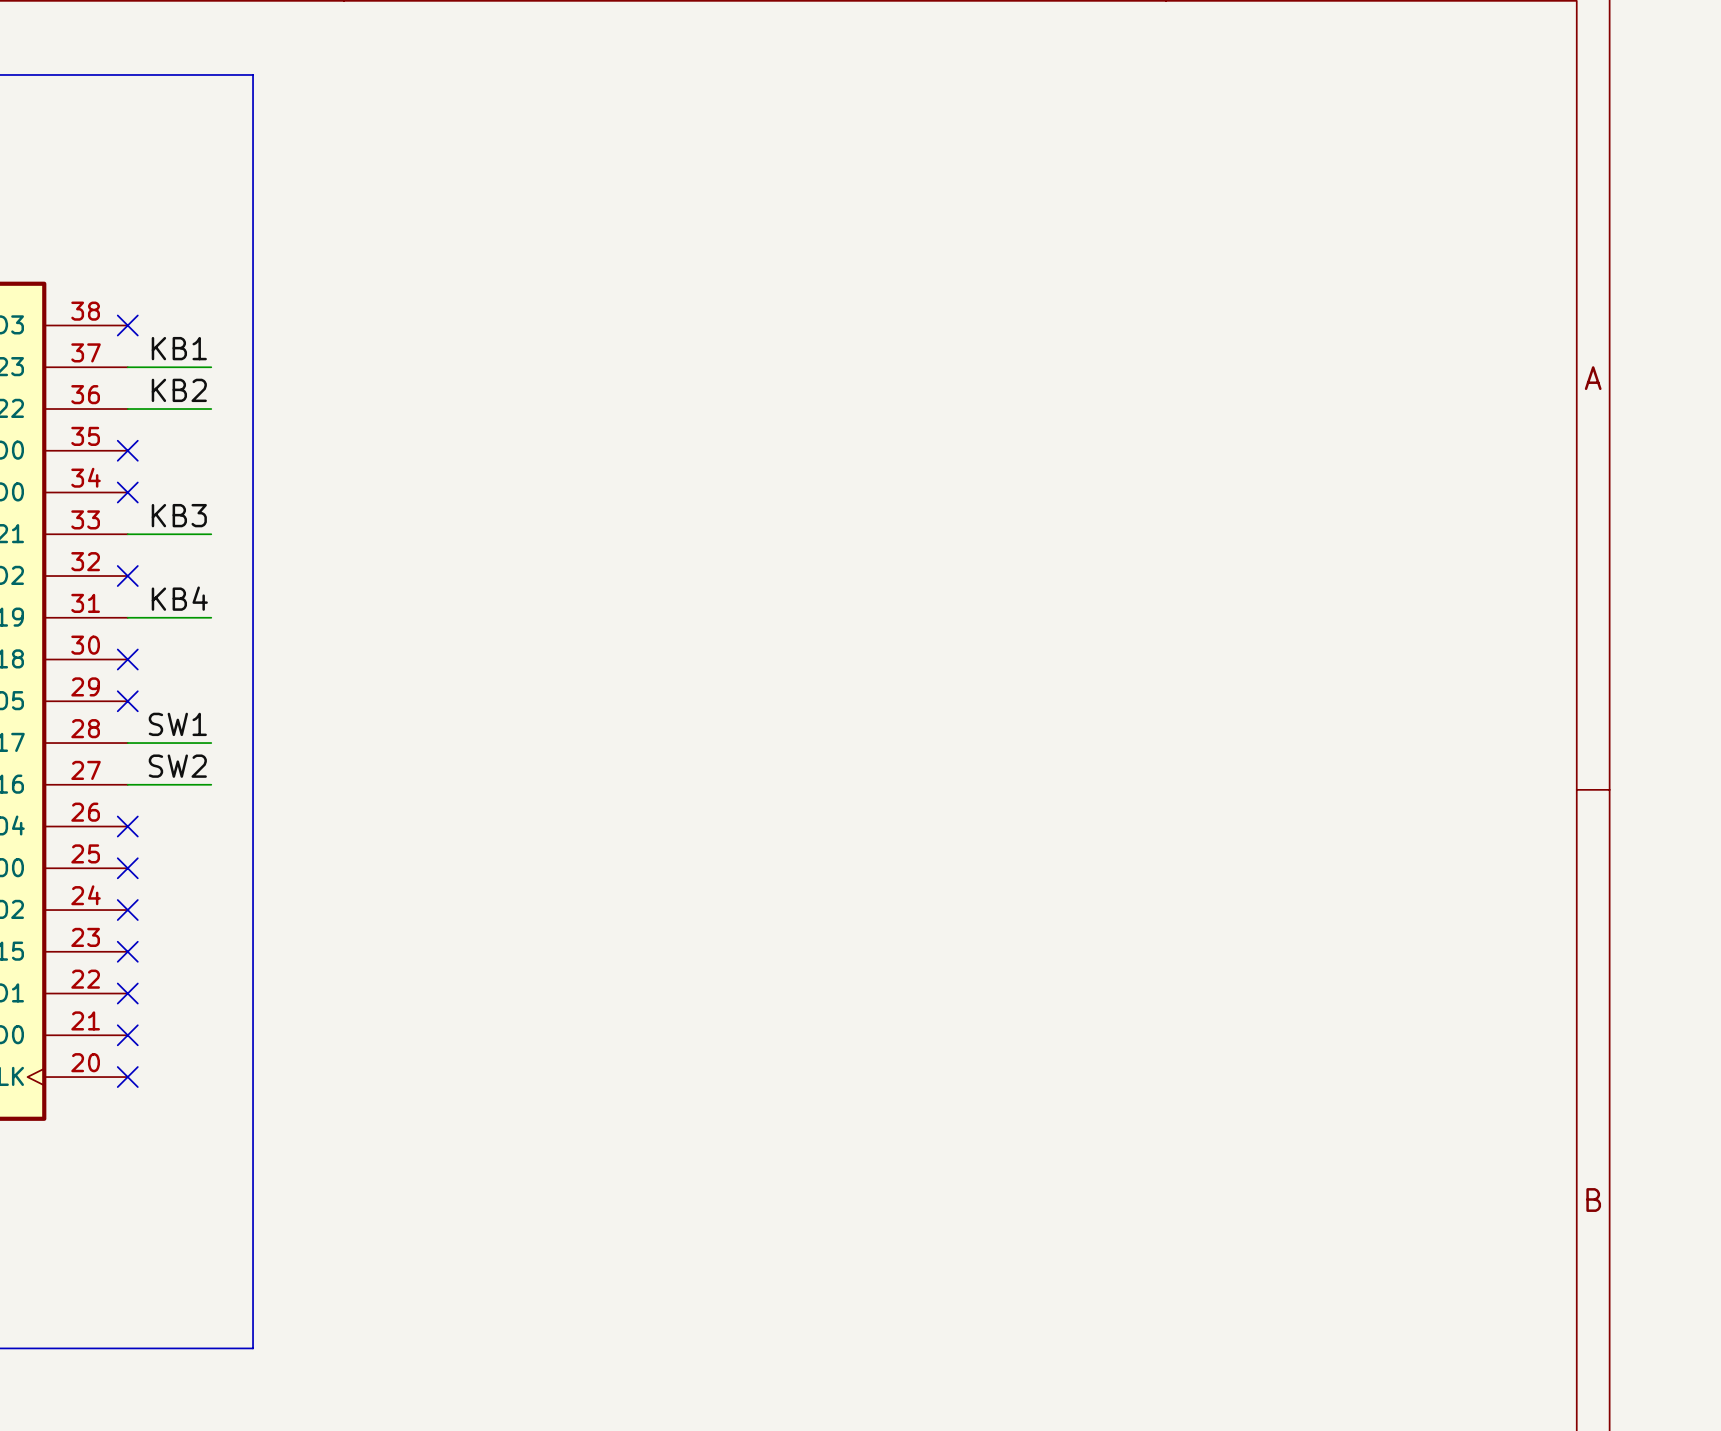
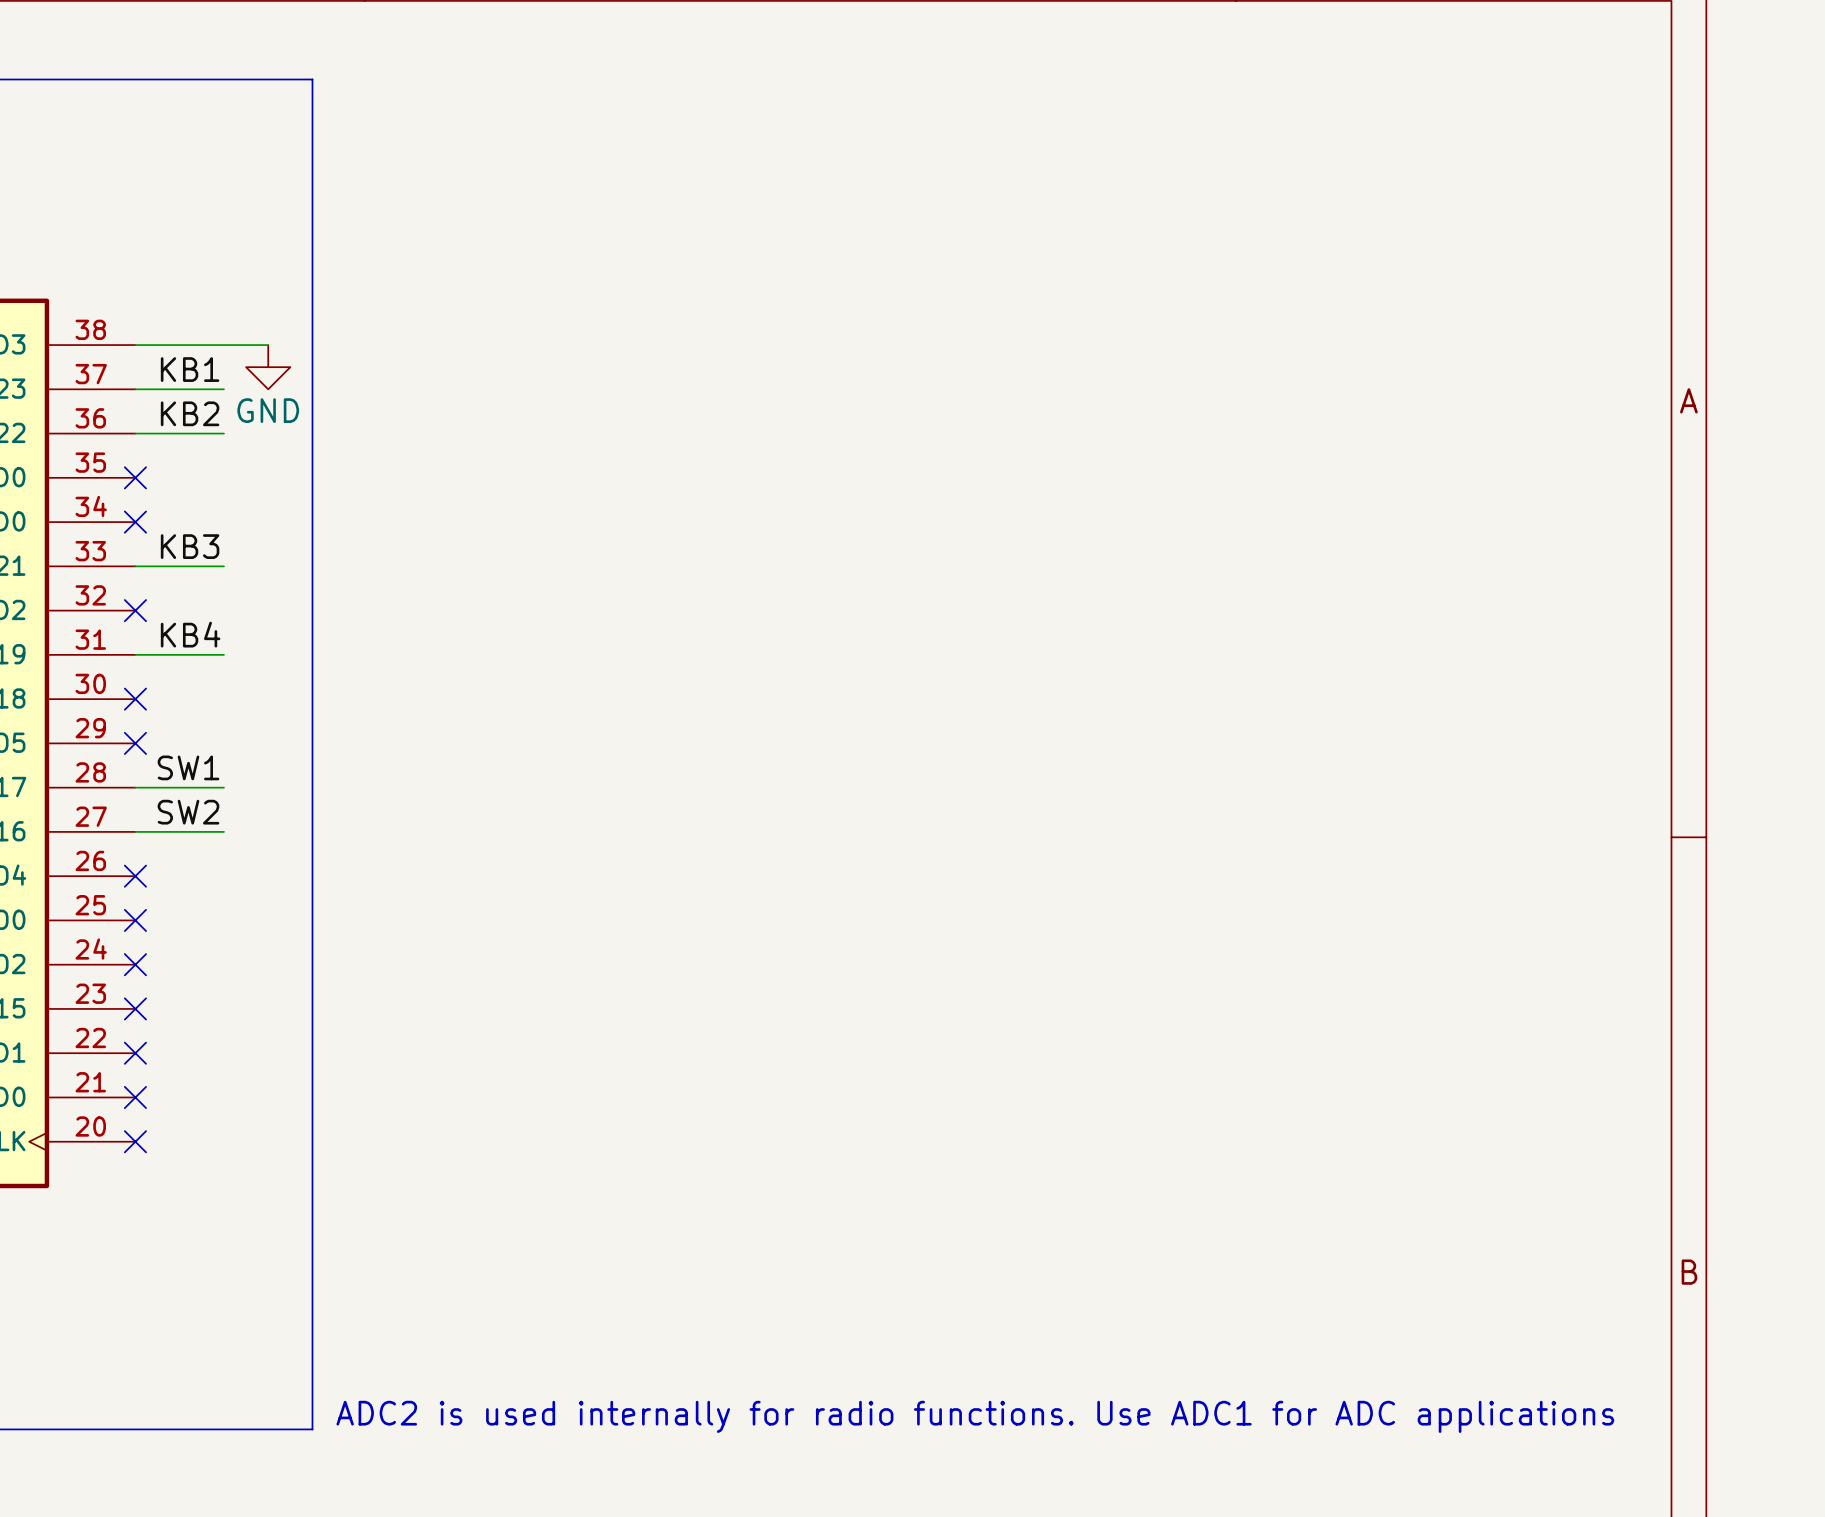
line: (253, 74) (253, 1348) -> (268, 79) (312, 79) (312, 1429) (268, 1429)
wire: none -> (135, 345) (268, 345)
no-connect mark: (127, 325) -> none
power symbol: none -> GND (268, 367)
text: none -> ADC2 is used internally for radio functions. Use ADC1 for ADC applications (975, 1416)

